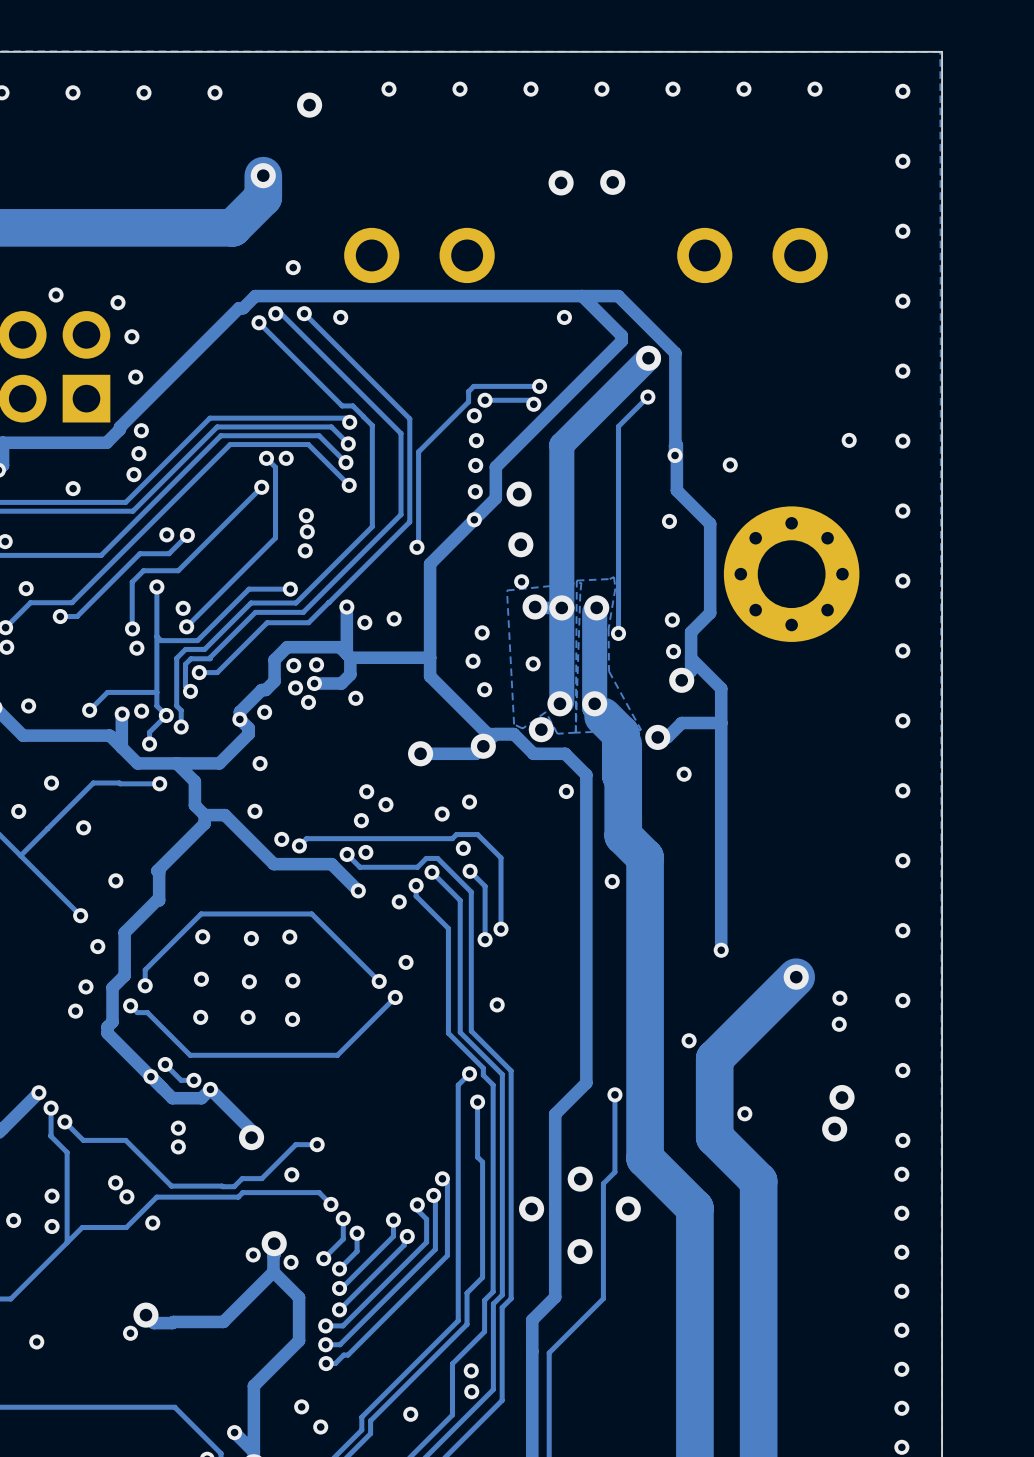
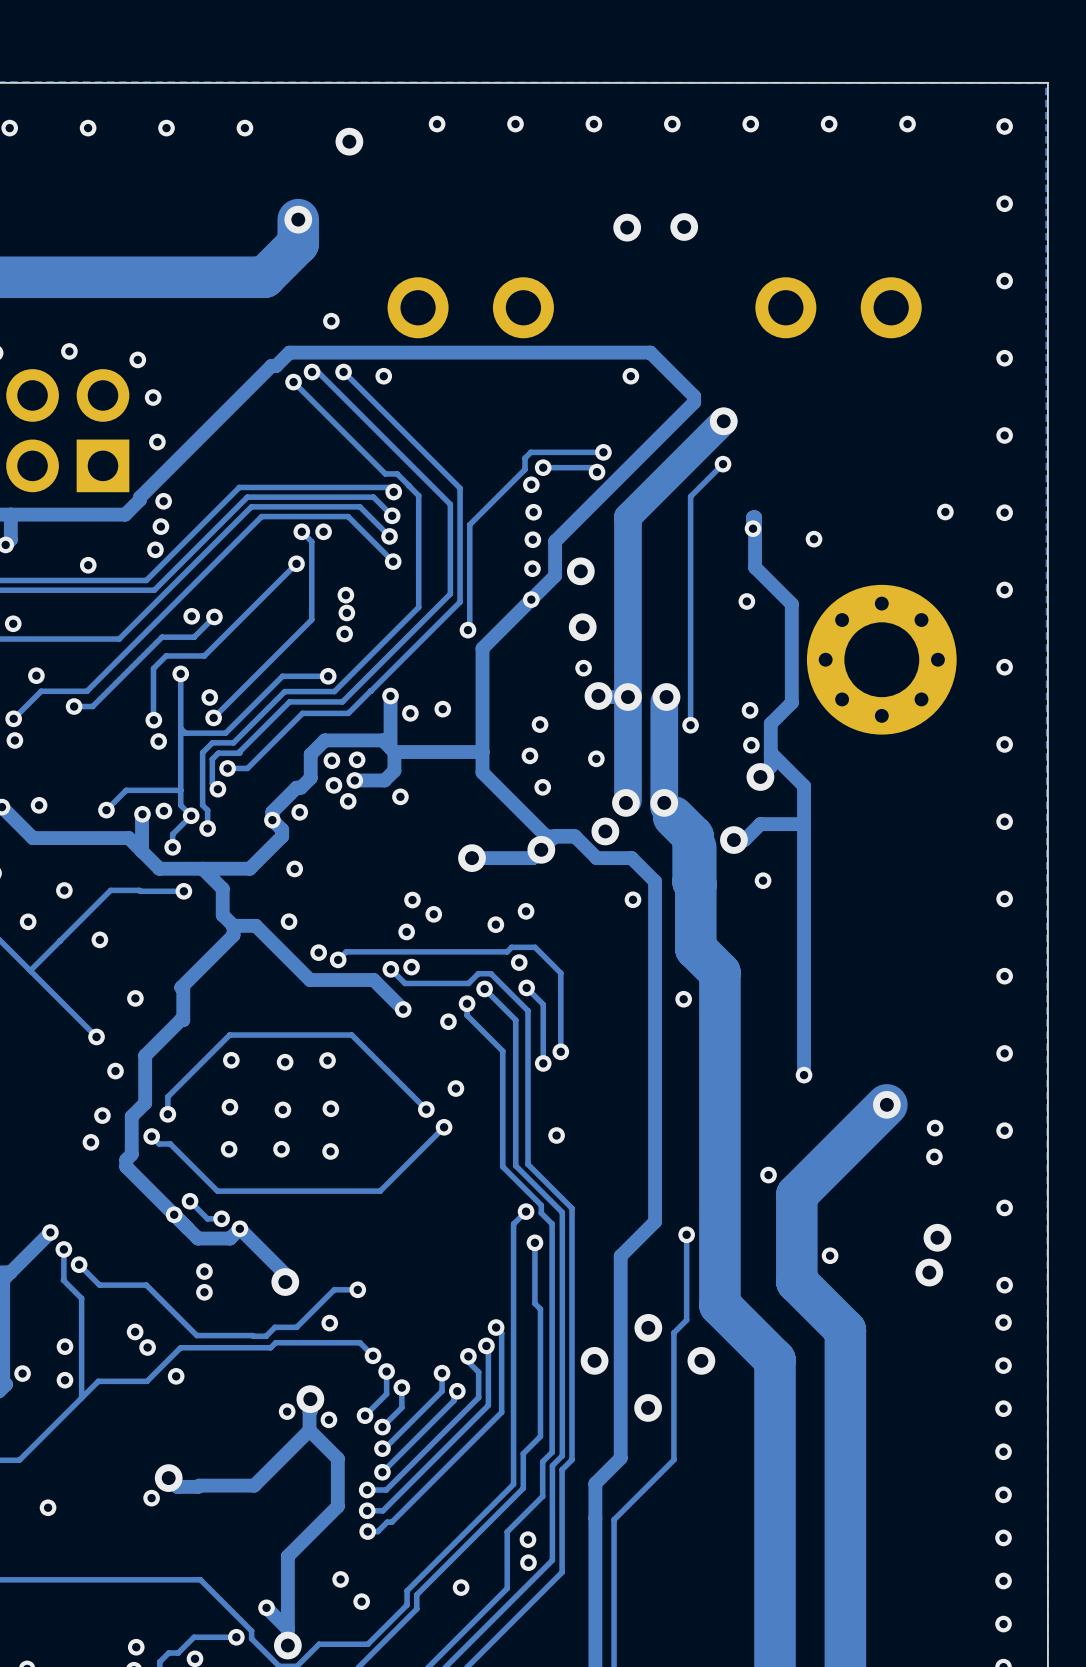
track: (582, 296) (618, 296) (675, 353) (675, 445) -> none
zone outline: (581, 582) (575, 732) -> none
zone outline: (581, 582) (507, 590) (514, 724) (522, 728) (545, 712) (557, 733) (575, 732) -> none
zone outline: (575, 732) (641, 730) (609, 671) (608, 628) (615, 588) (614, 576) (609, 579) (576, 580) (575, 732) -> none

